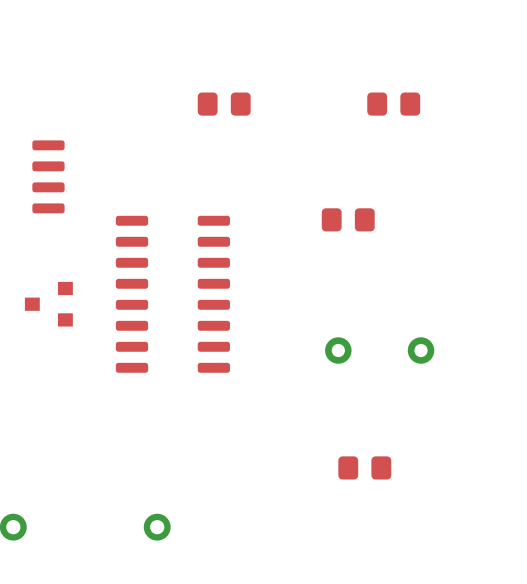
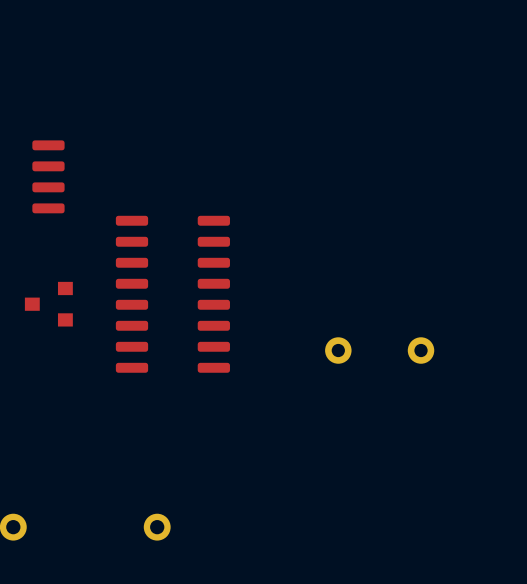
part: (224, 104) -> none
part: (393, 104) -> none
part: (348, 219) -> none
part: (364, 467) -> none

